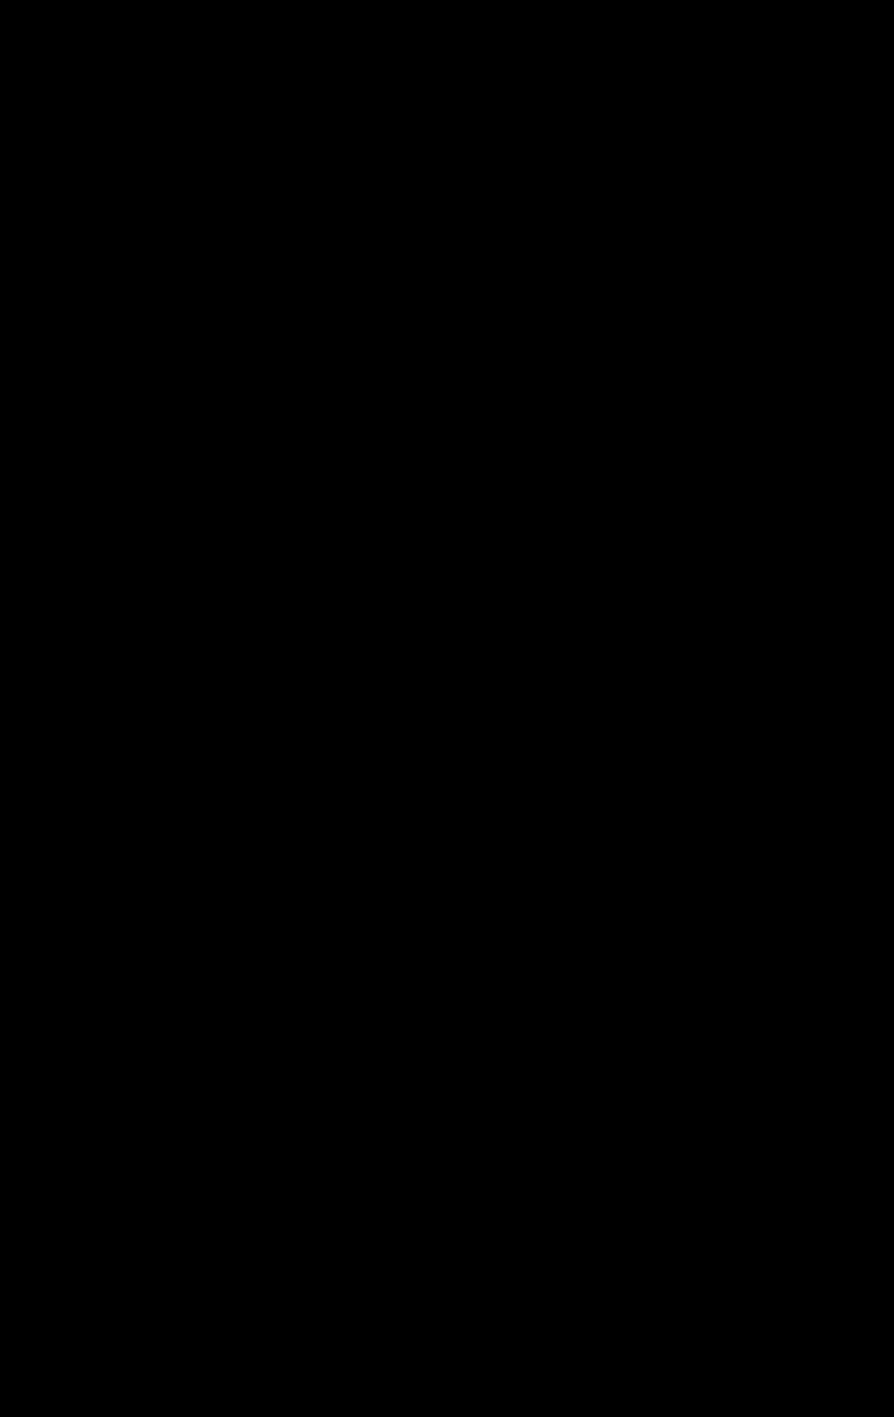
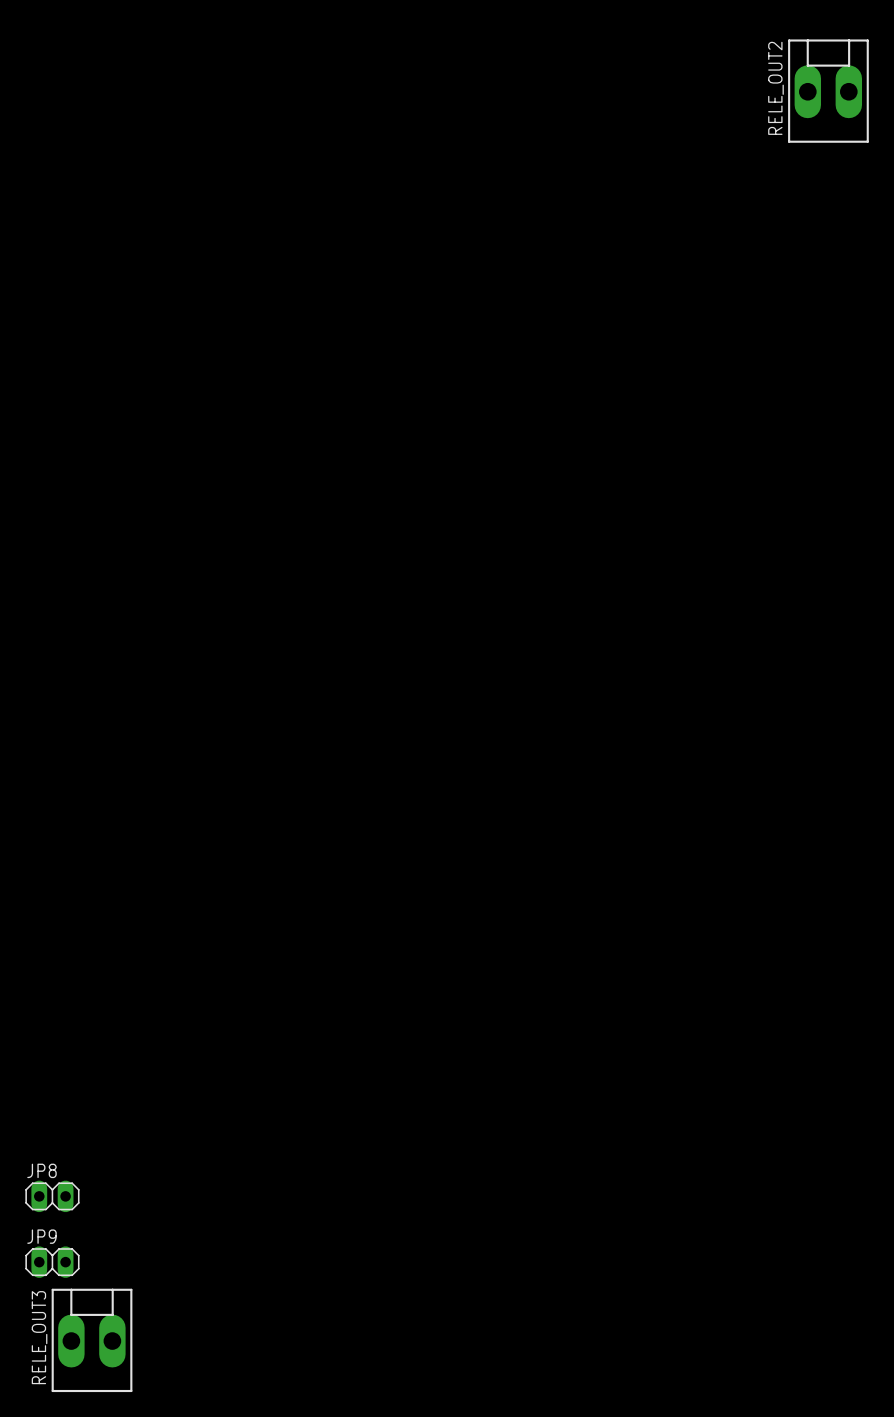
RELE_OUT2: none -> (828, 91)
JP8: none -> (52, 1196)
JP9: none -> (52, 1262)
RELE_OUT3: none -> (92, 1340)

